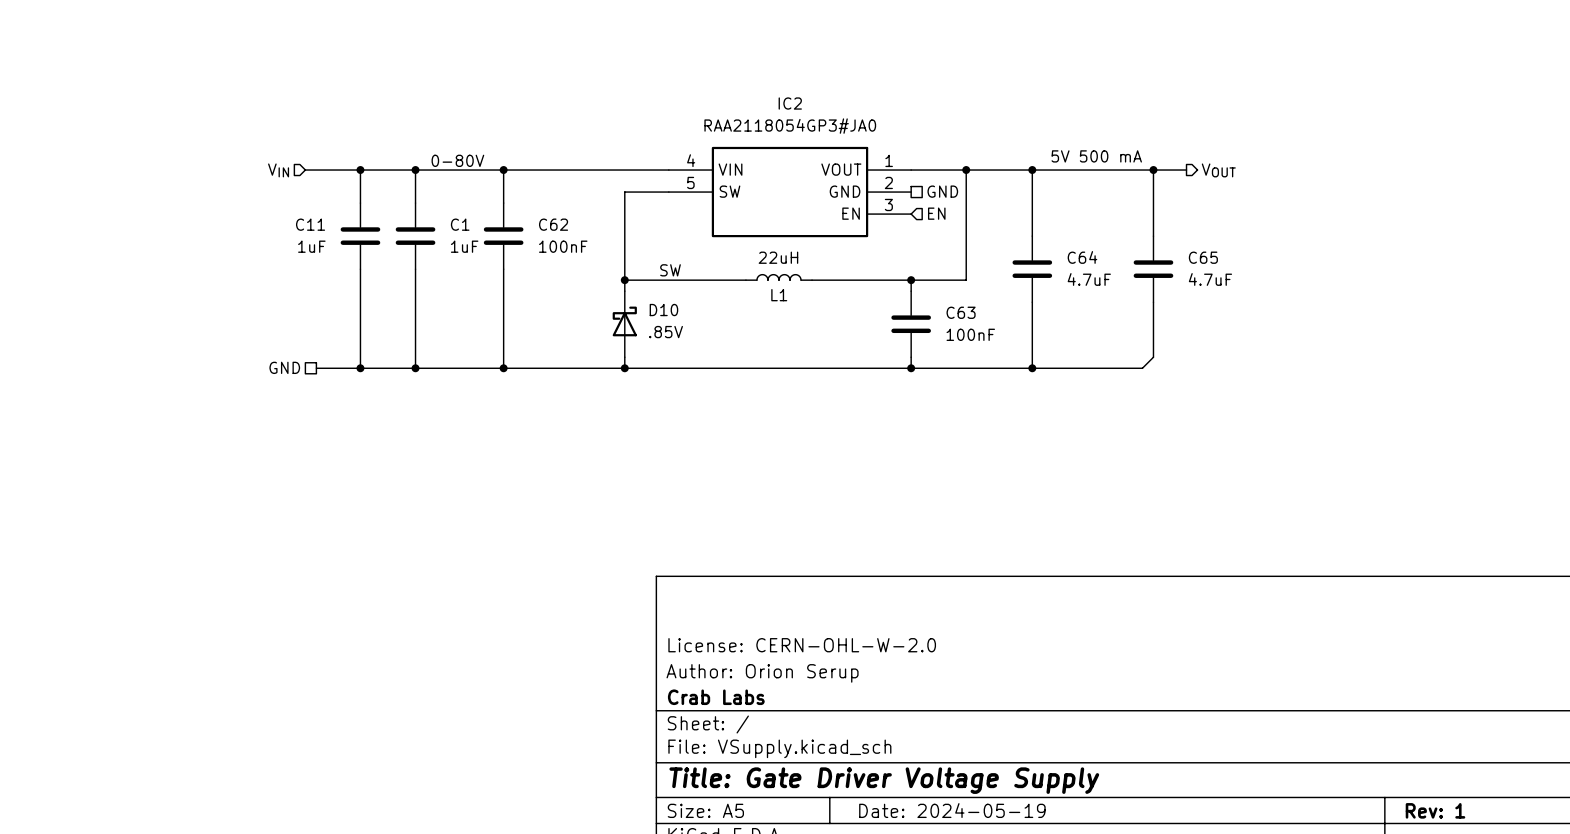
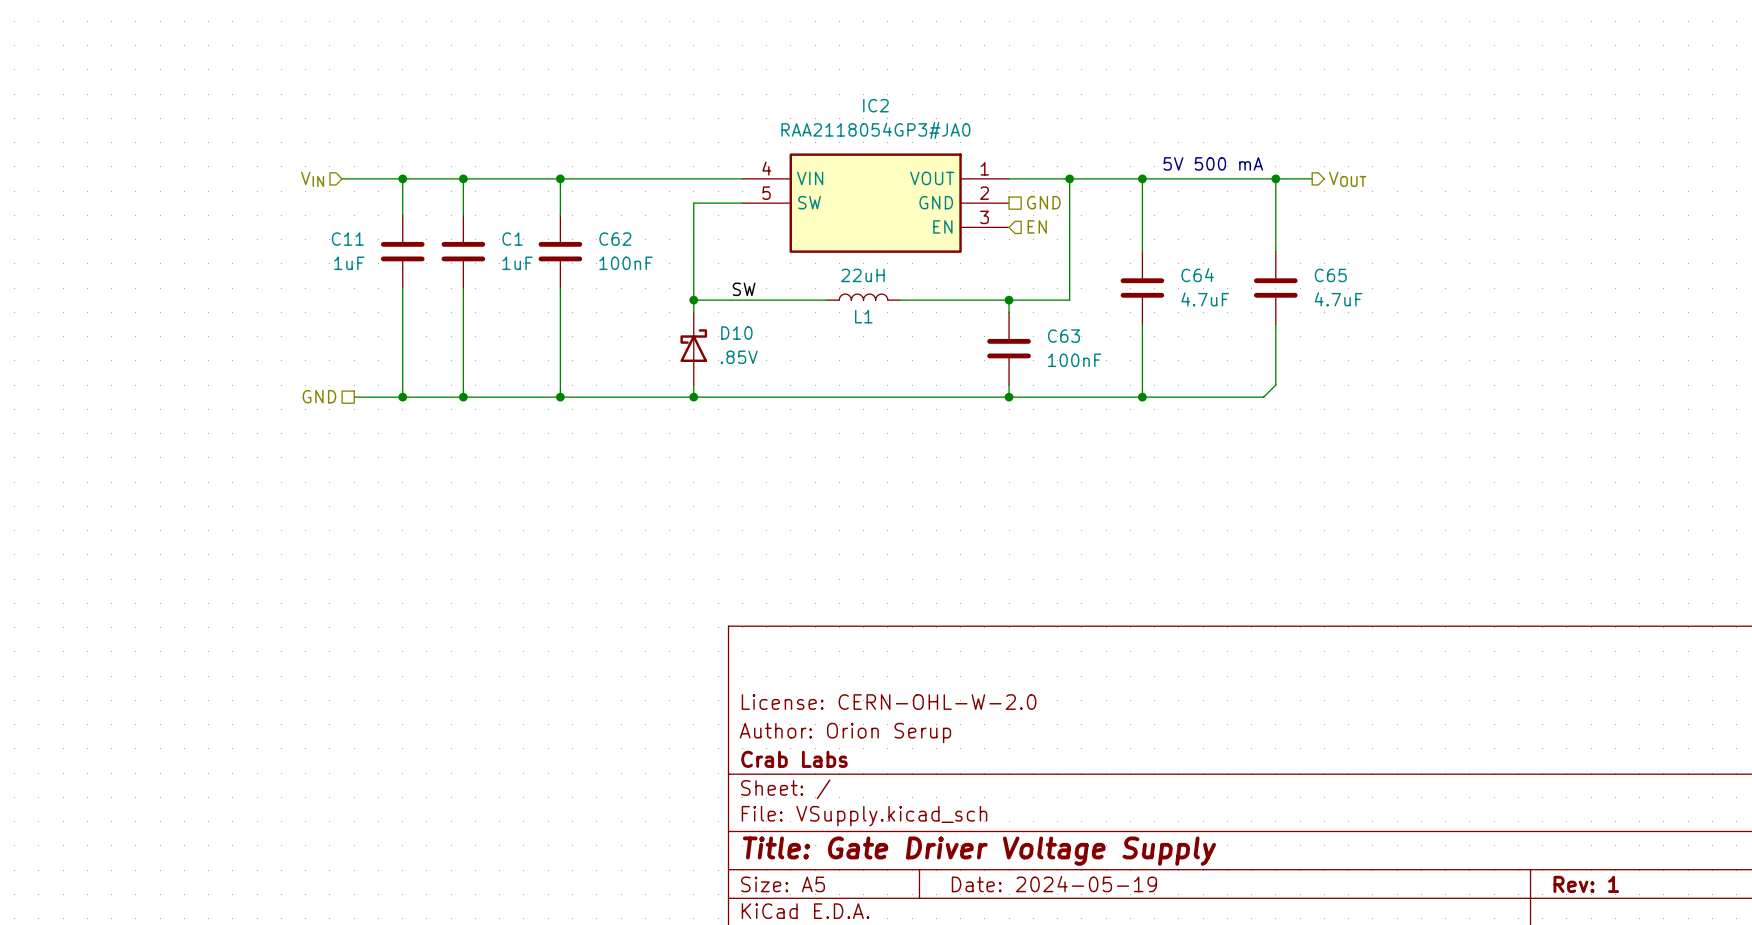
text: 0-80V (457, 160) -> none

